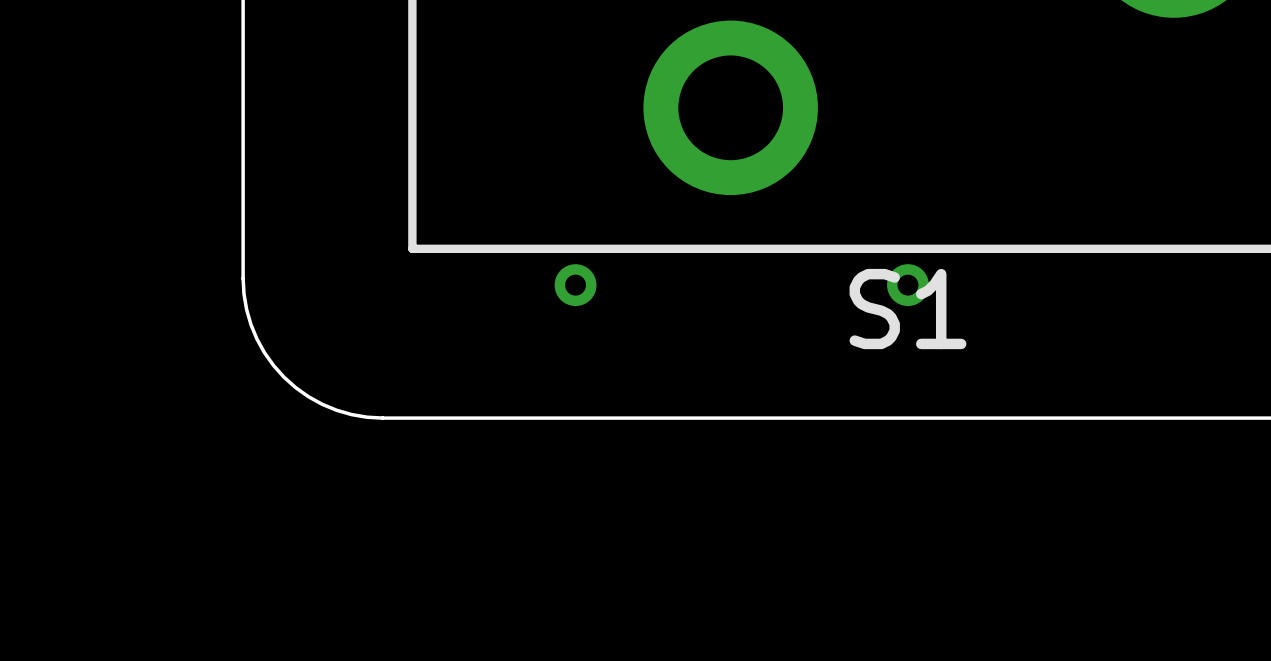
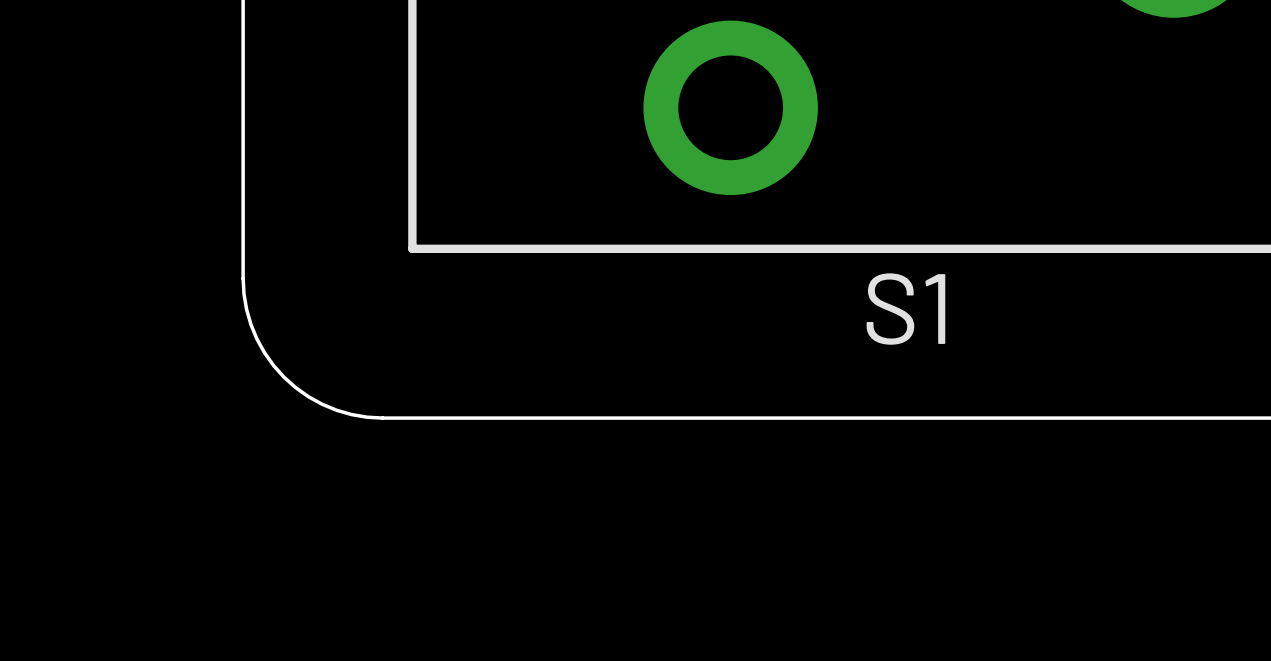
via: (575, 285) -> none
via: (907, 285) -> none

